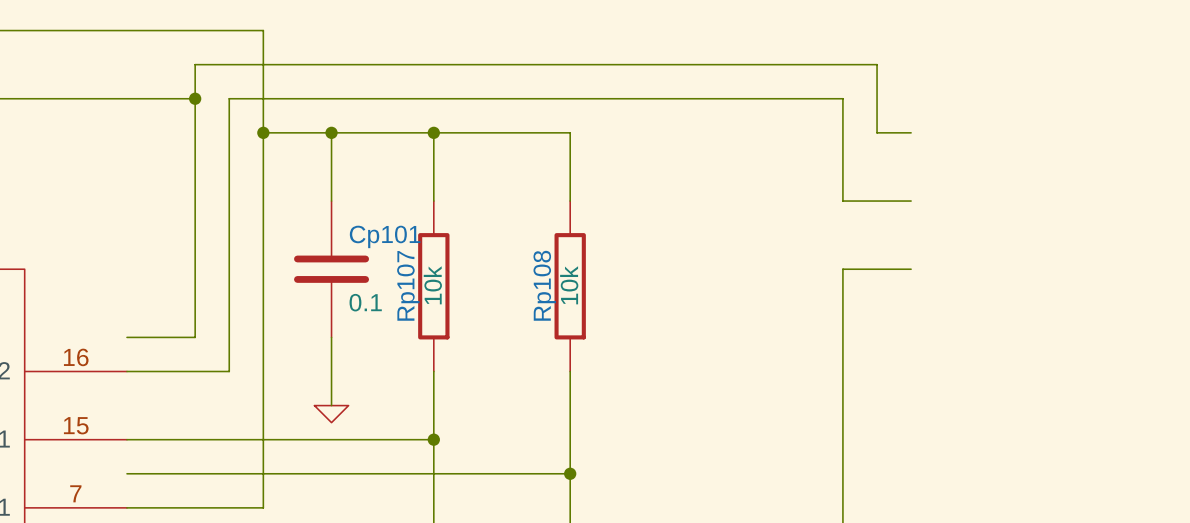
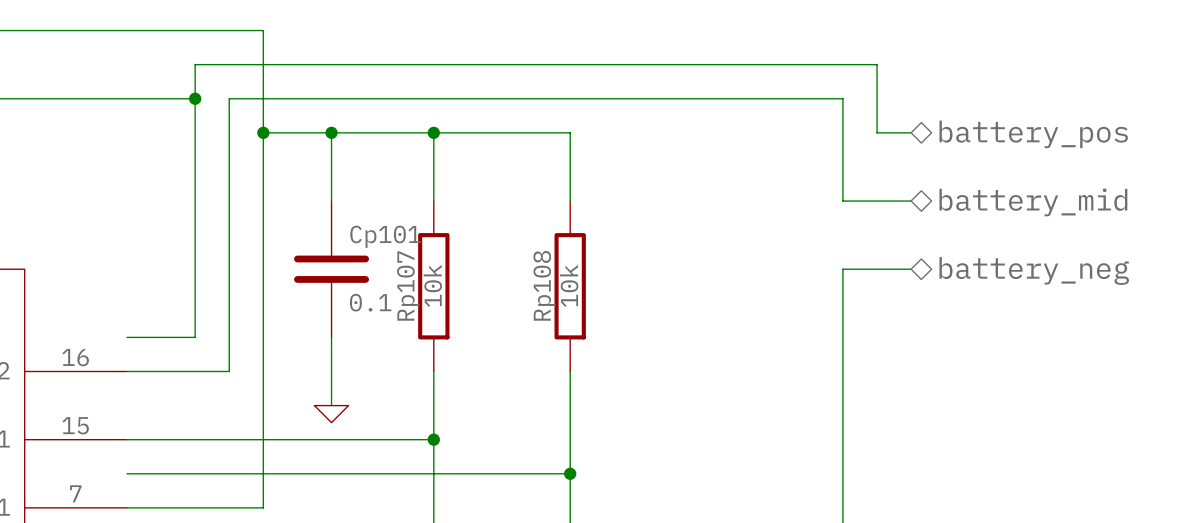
hierarchical label: none -> battery_pos (1033, 134)
hierarchical label: none -> battery_mid (1033, 202)
hierarchical label: none -> battery_neg (1034, 270)

